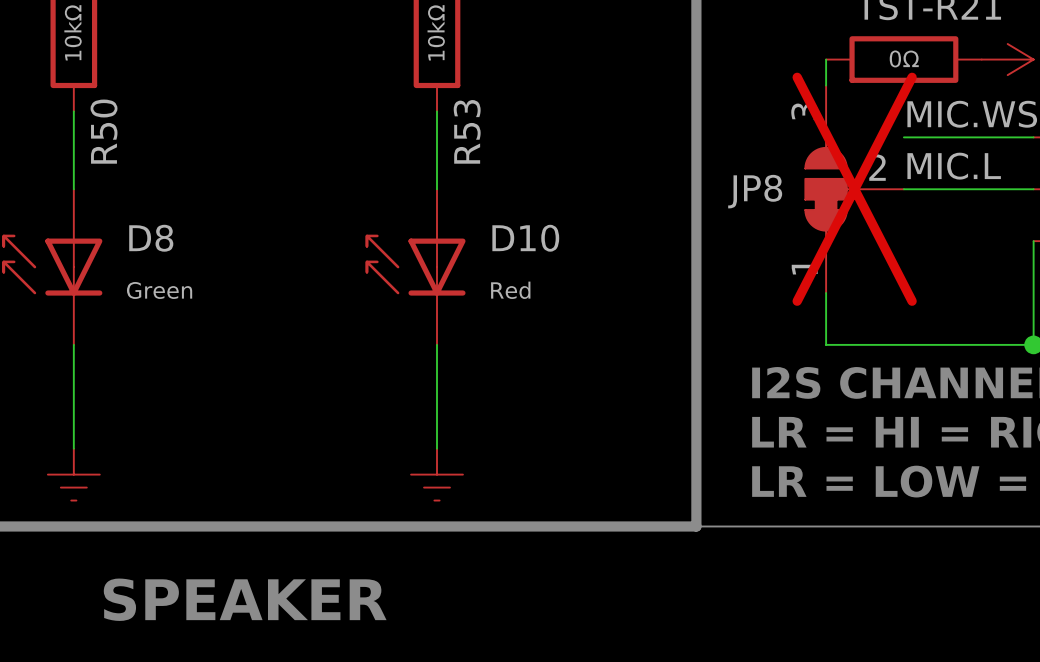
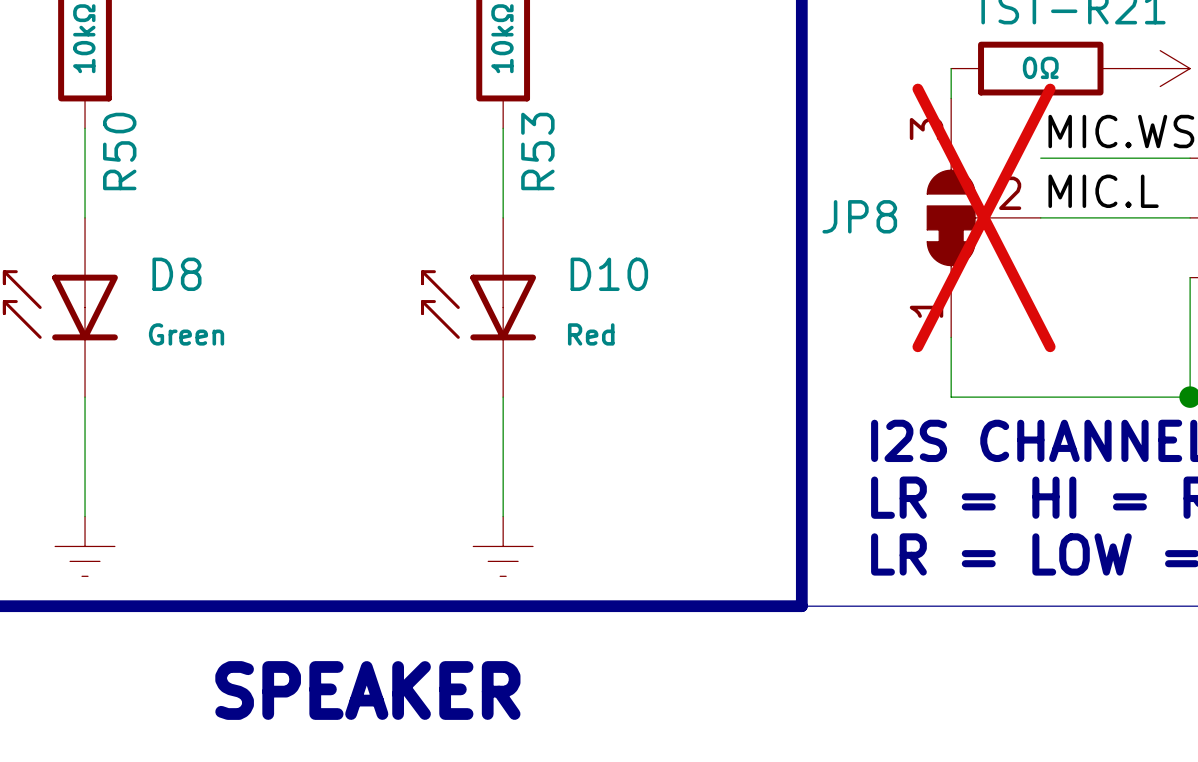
text position: SPEAKER (245, 599) -> SPEAKER (367, 690)

